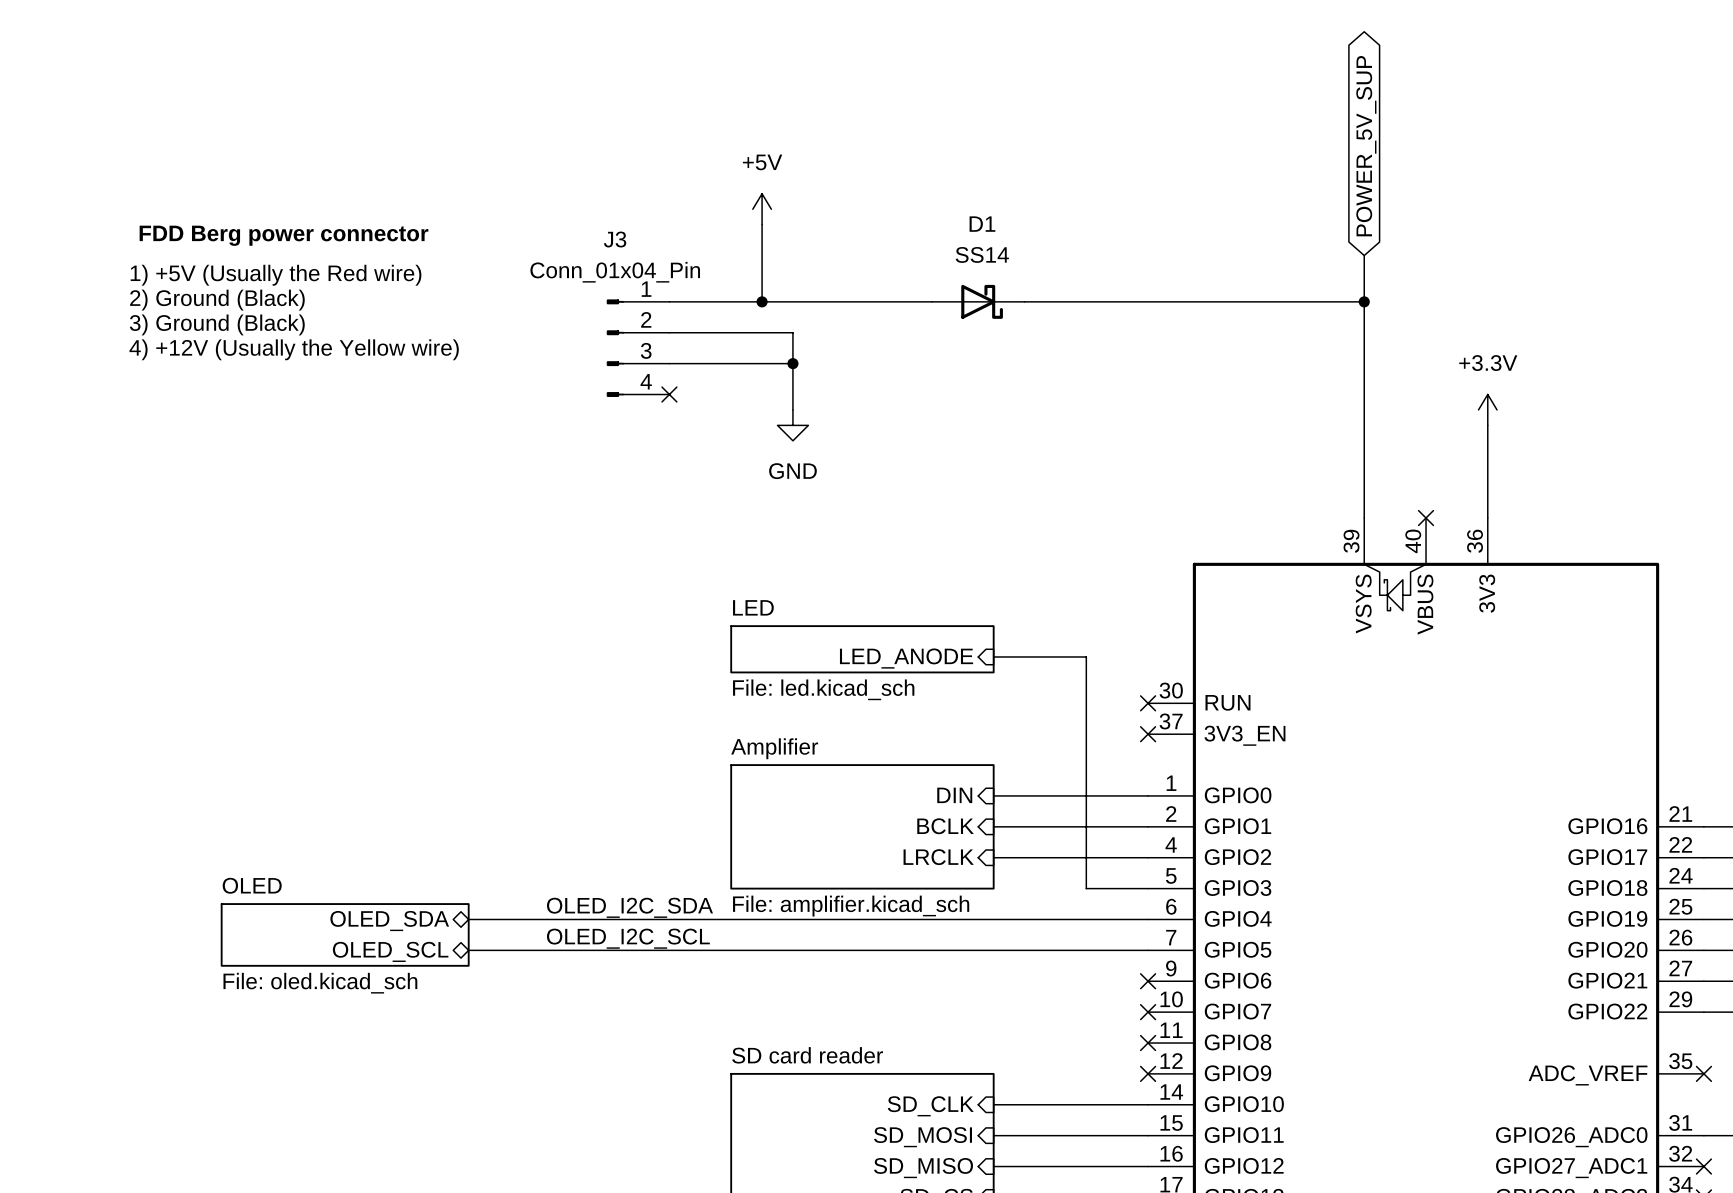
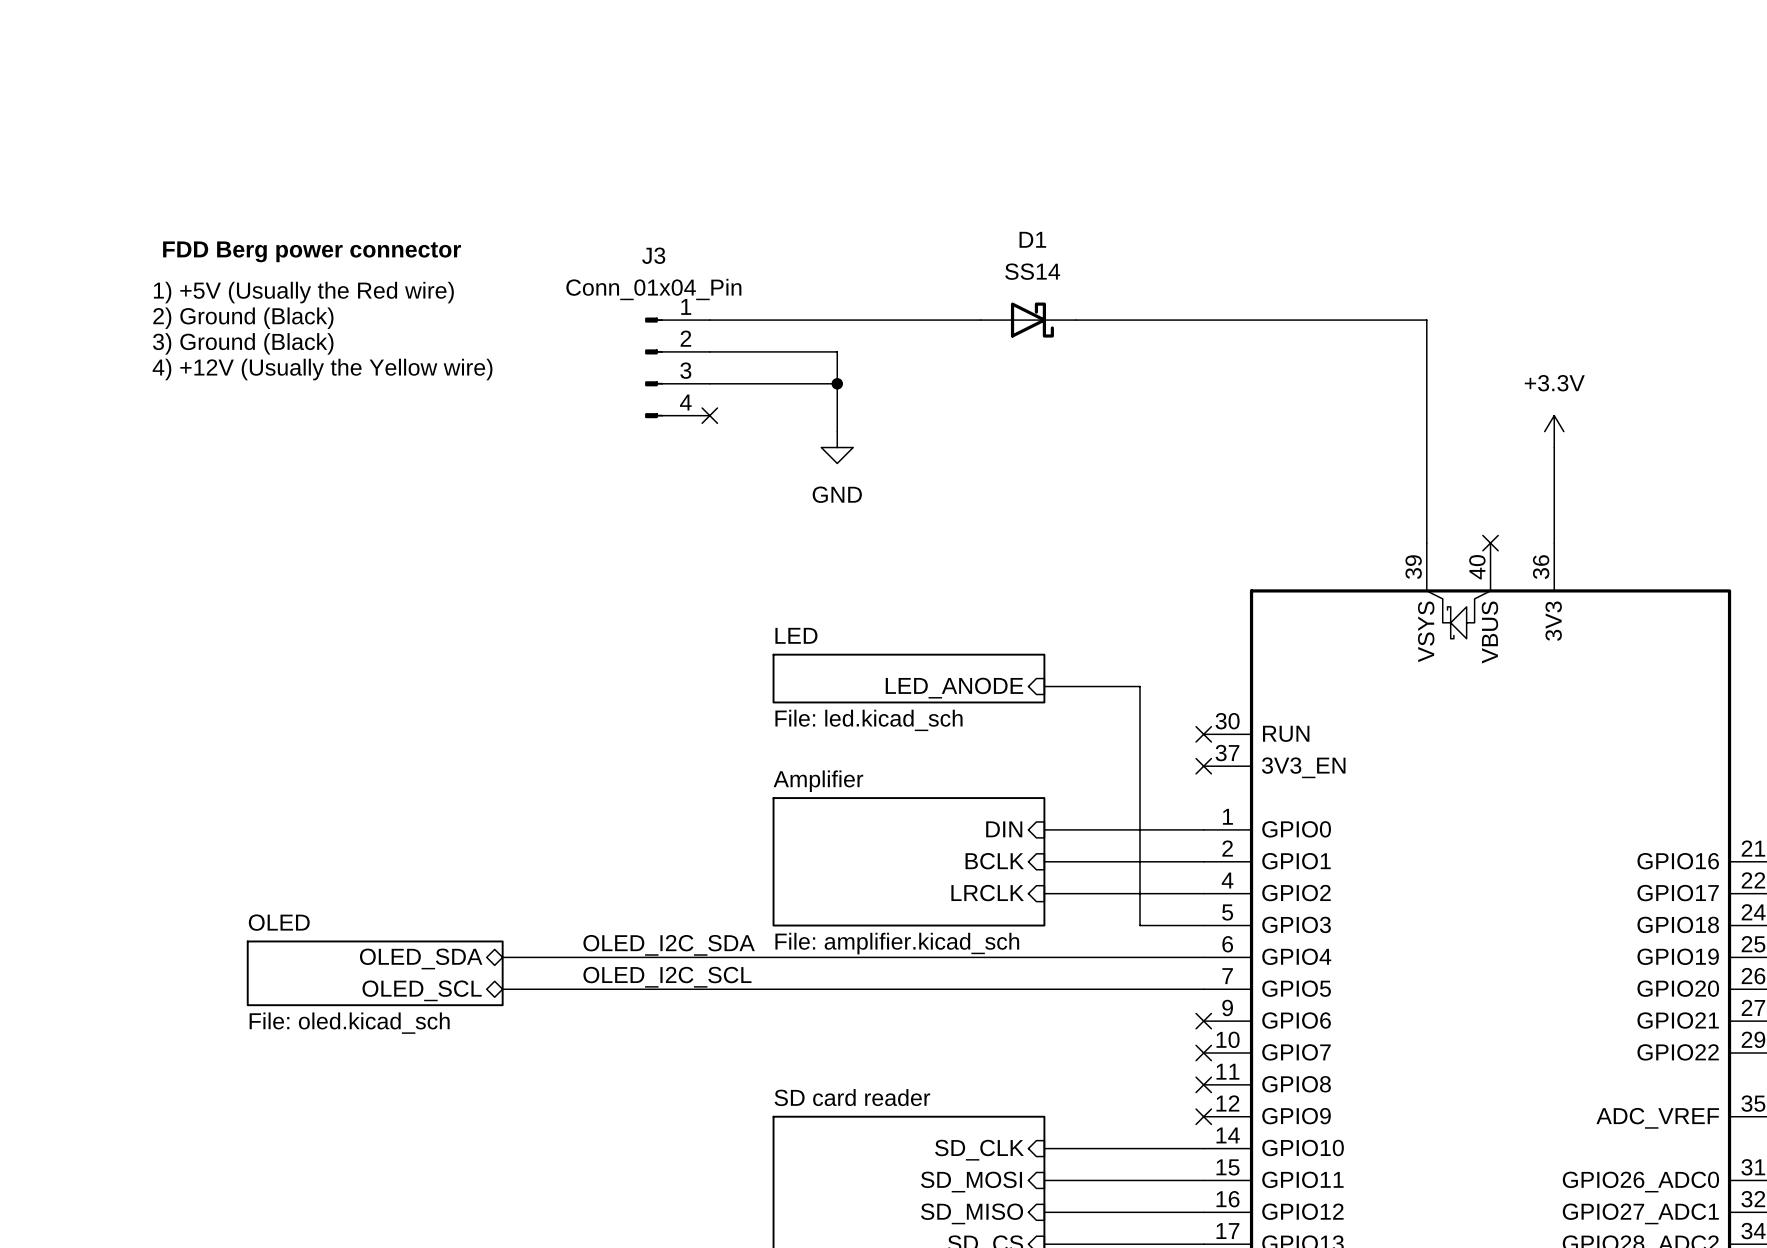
global label: POWER_5V_SUP (1366, 146) -> none
power symbol: +5V (762, 209) -> none
wire: (762, 224) (762, 301) -> none
wire: (1364, 255) (1364, 301) -> none
junction: (762, 301) -> none
junction: (1364, 301) -> none

